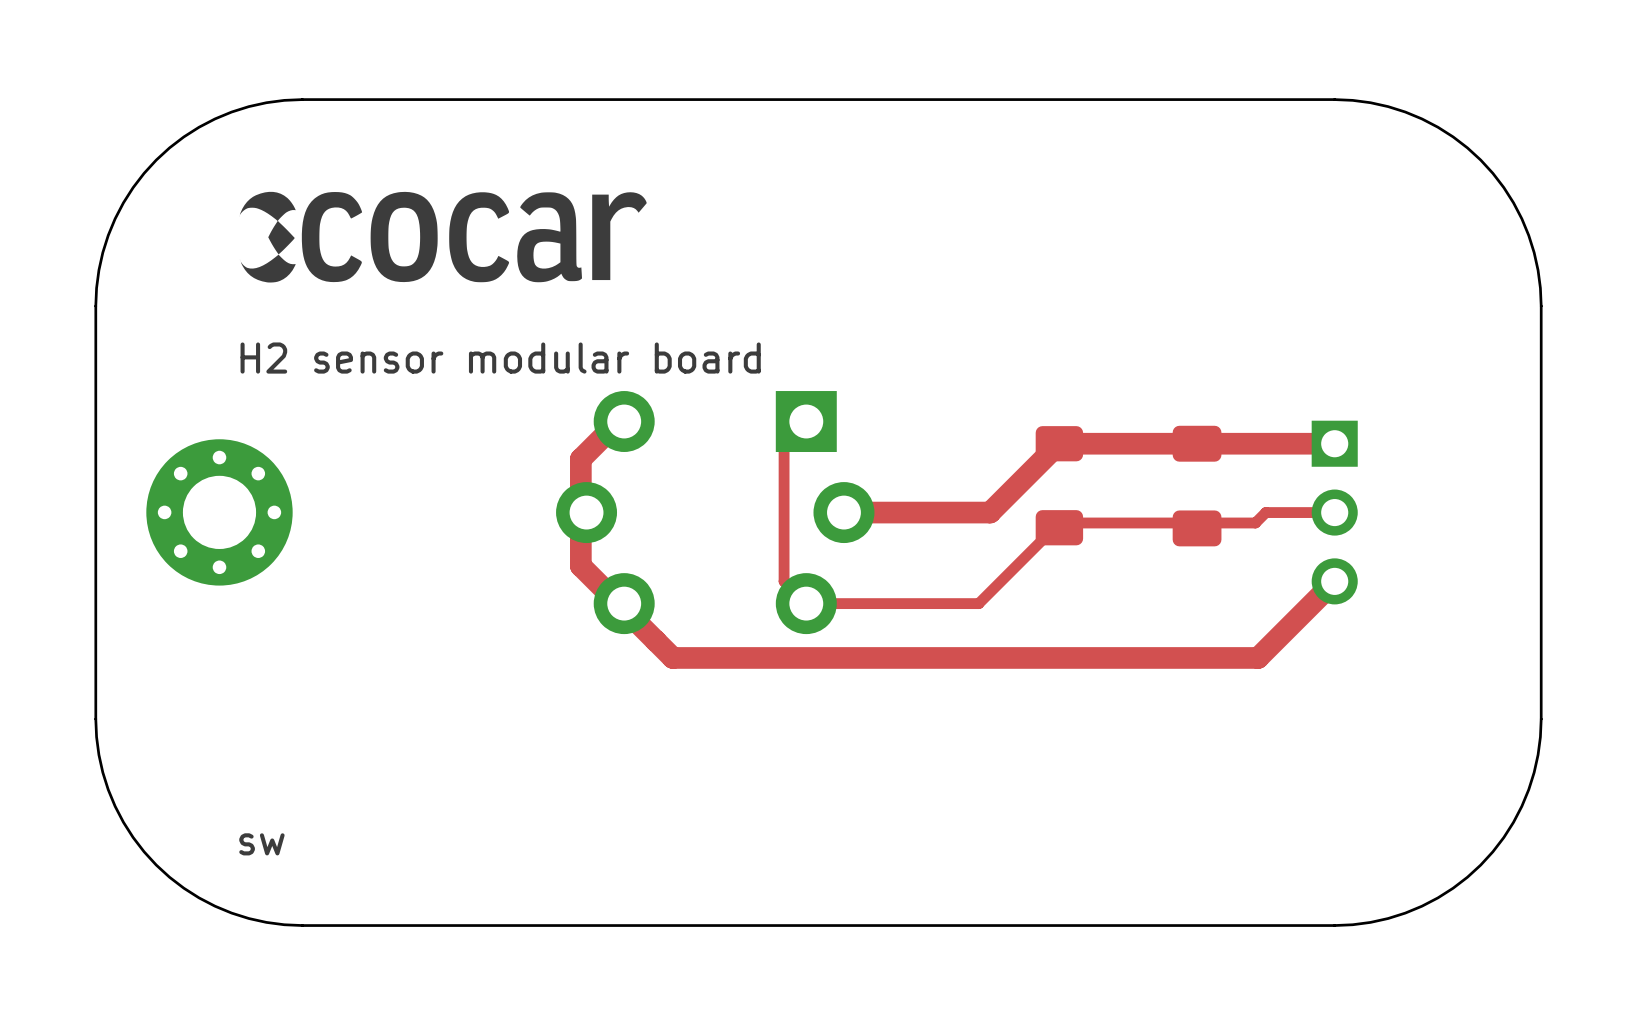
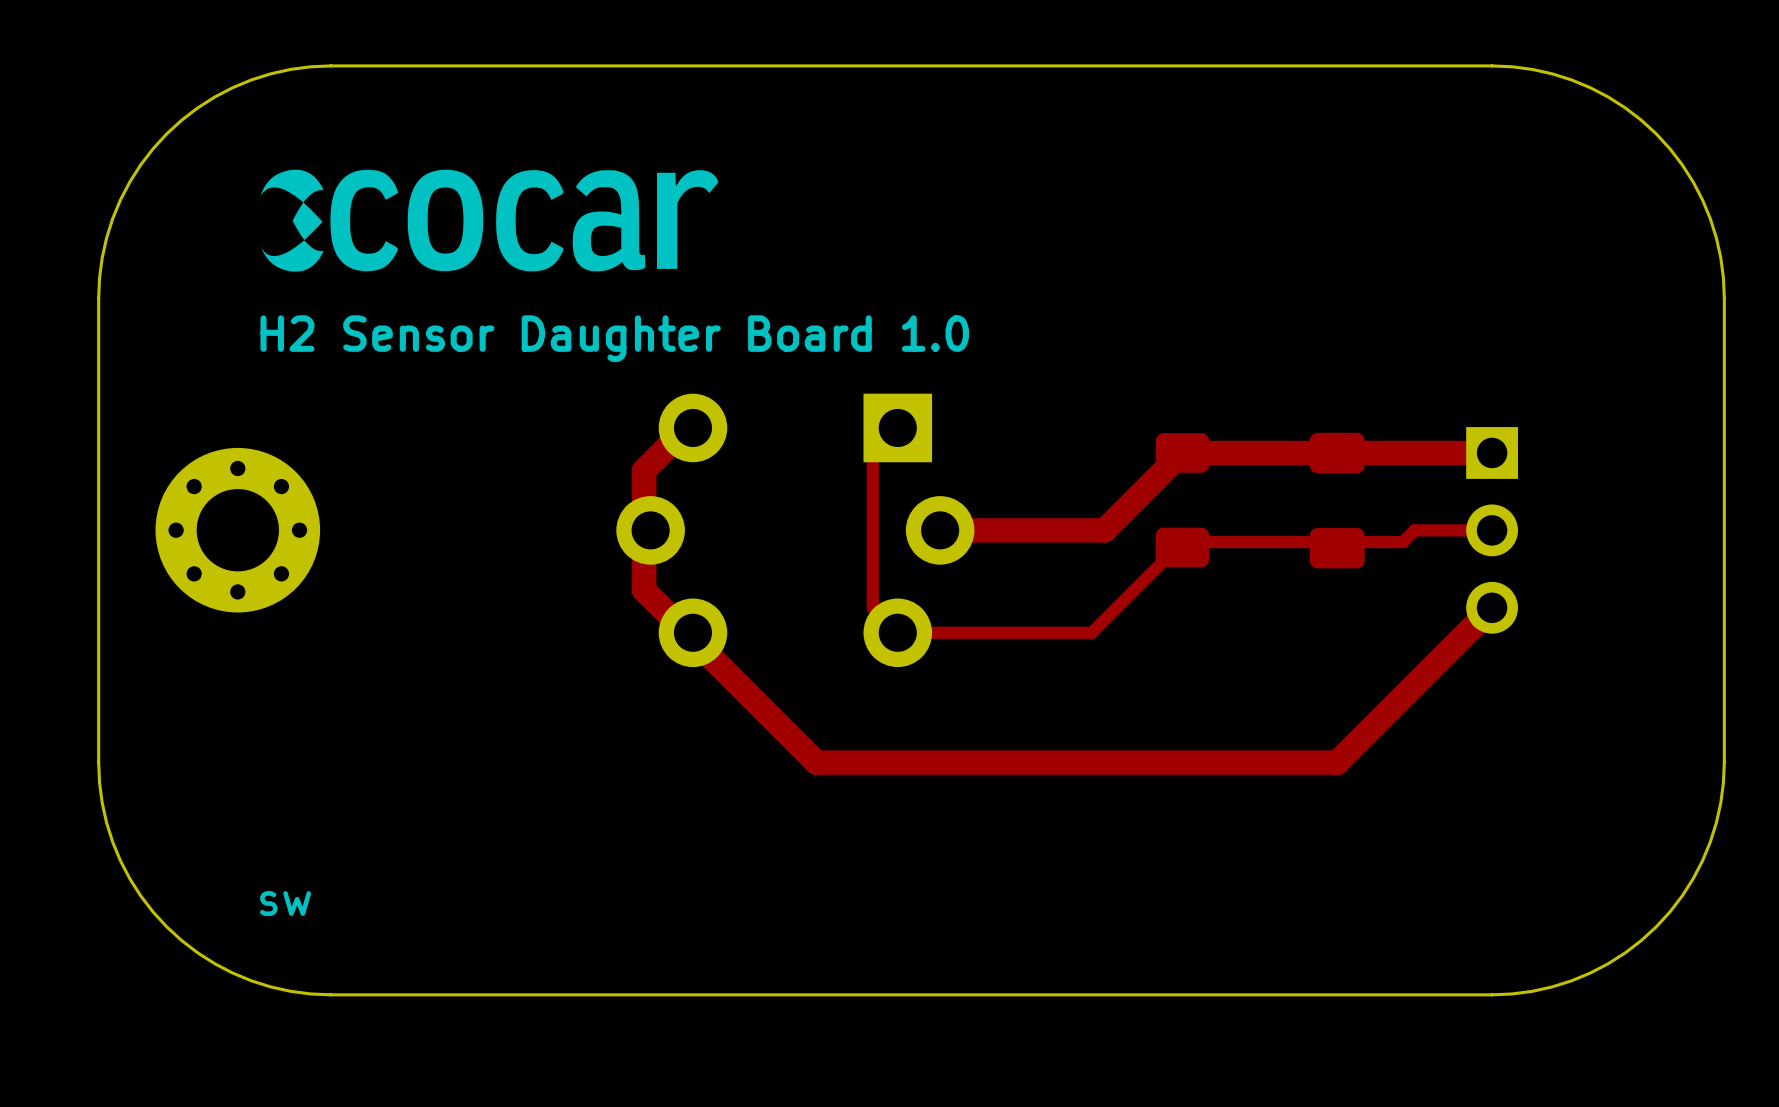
text: H2 sensor modular board (500, 358) -> H2 Sensor Daughter Board 1.0 (614, 338)
top track: (1258, 657) (672, 657) -> (1405, 693) (1337, 762) (816, 762) (747, 693)

